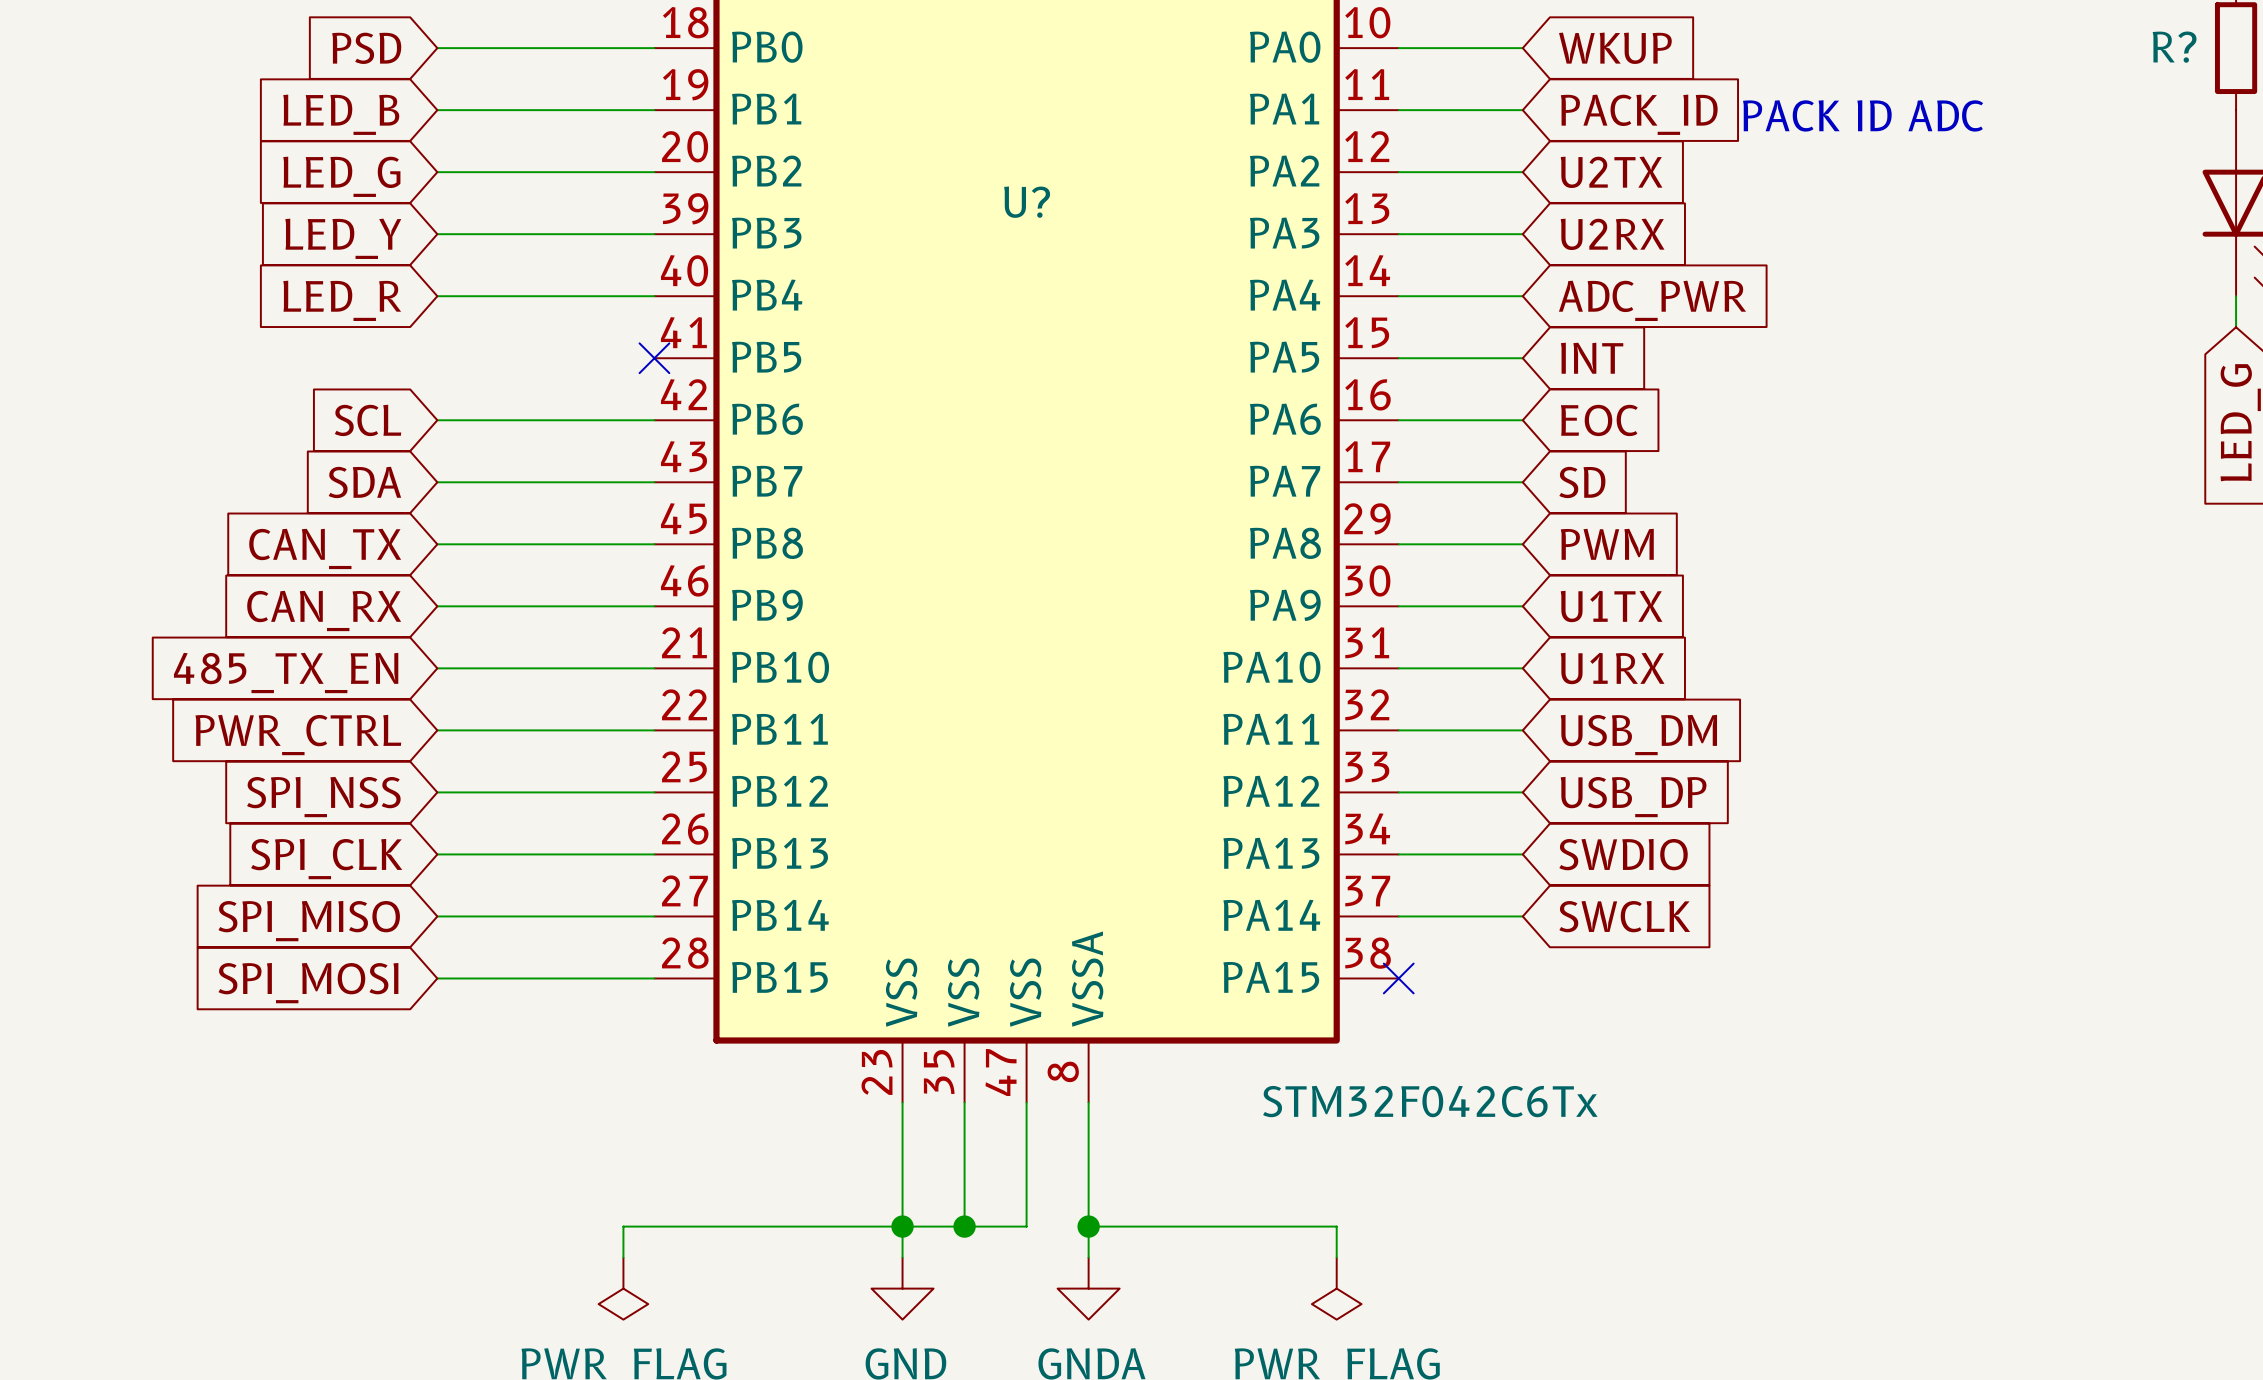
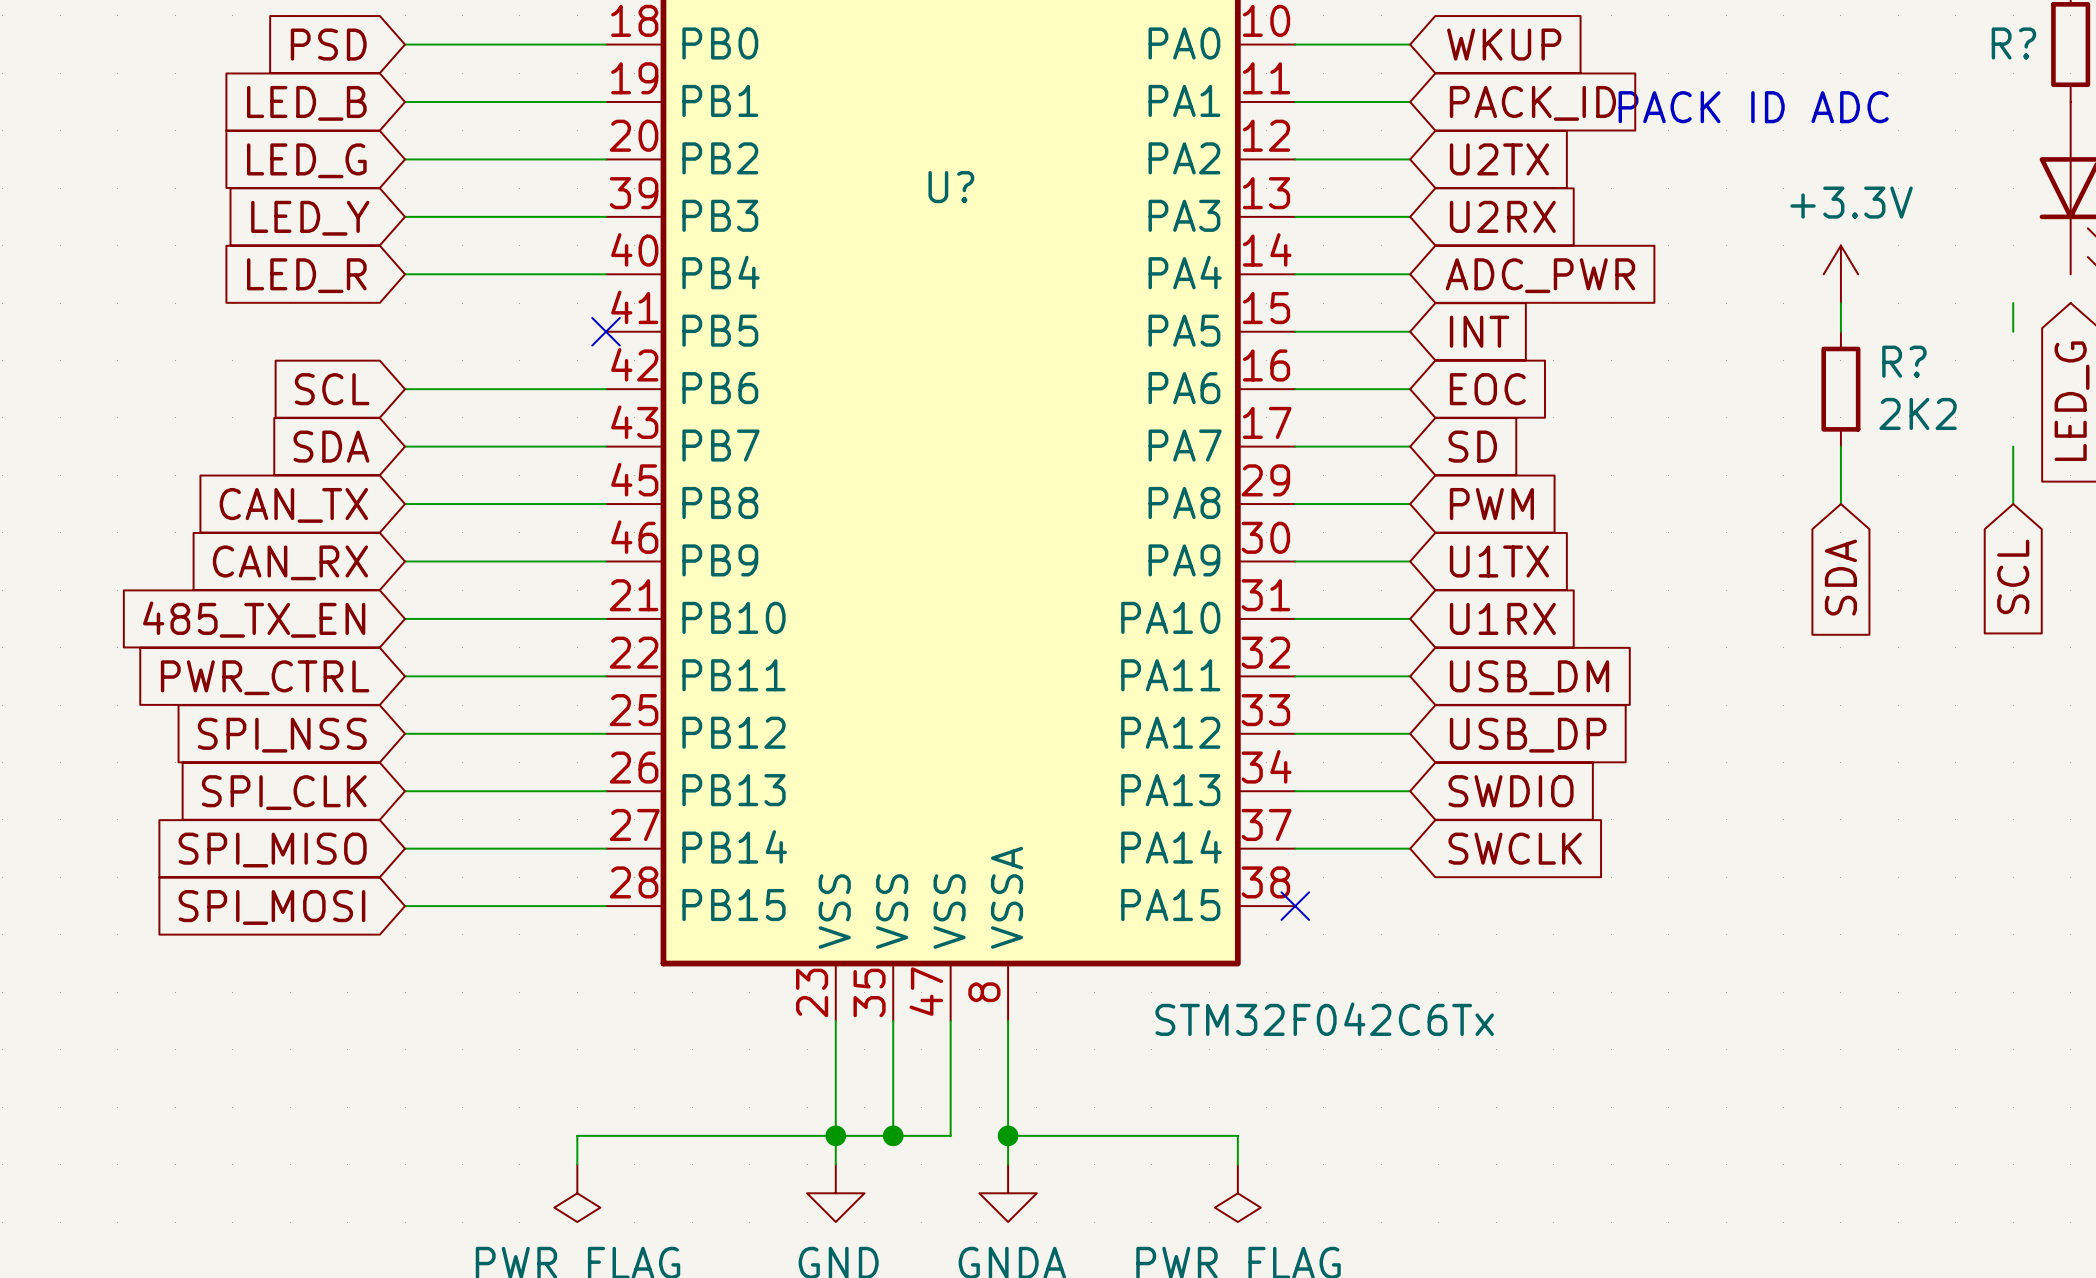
power symbol: none -> +3.3V (1840, 274)
wire: (2236, 296) (2236, 327) -> (2013, 303) (2013, 331)
wire: none -> (1840, 303) (1840, 331)
R?: none -> 2K2 (1840, 389)
wire: none -> (1840, 446) (1840, 504)
wire: none -> (2013, 446) (2013, 504)
global label: none -> SCL (2013, 576)
global label: none -> SDA (1840, 577)

